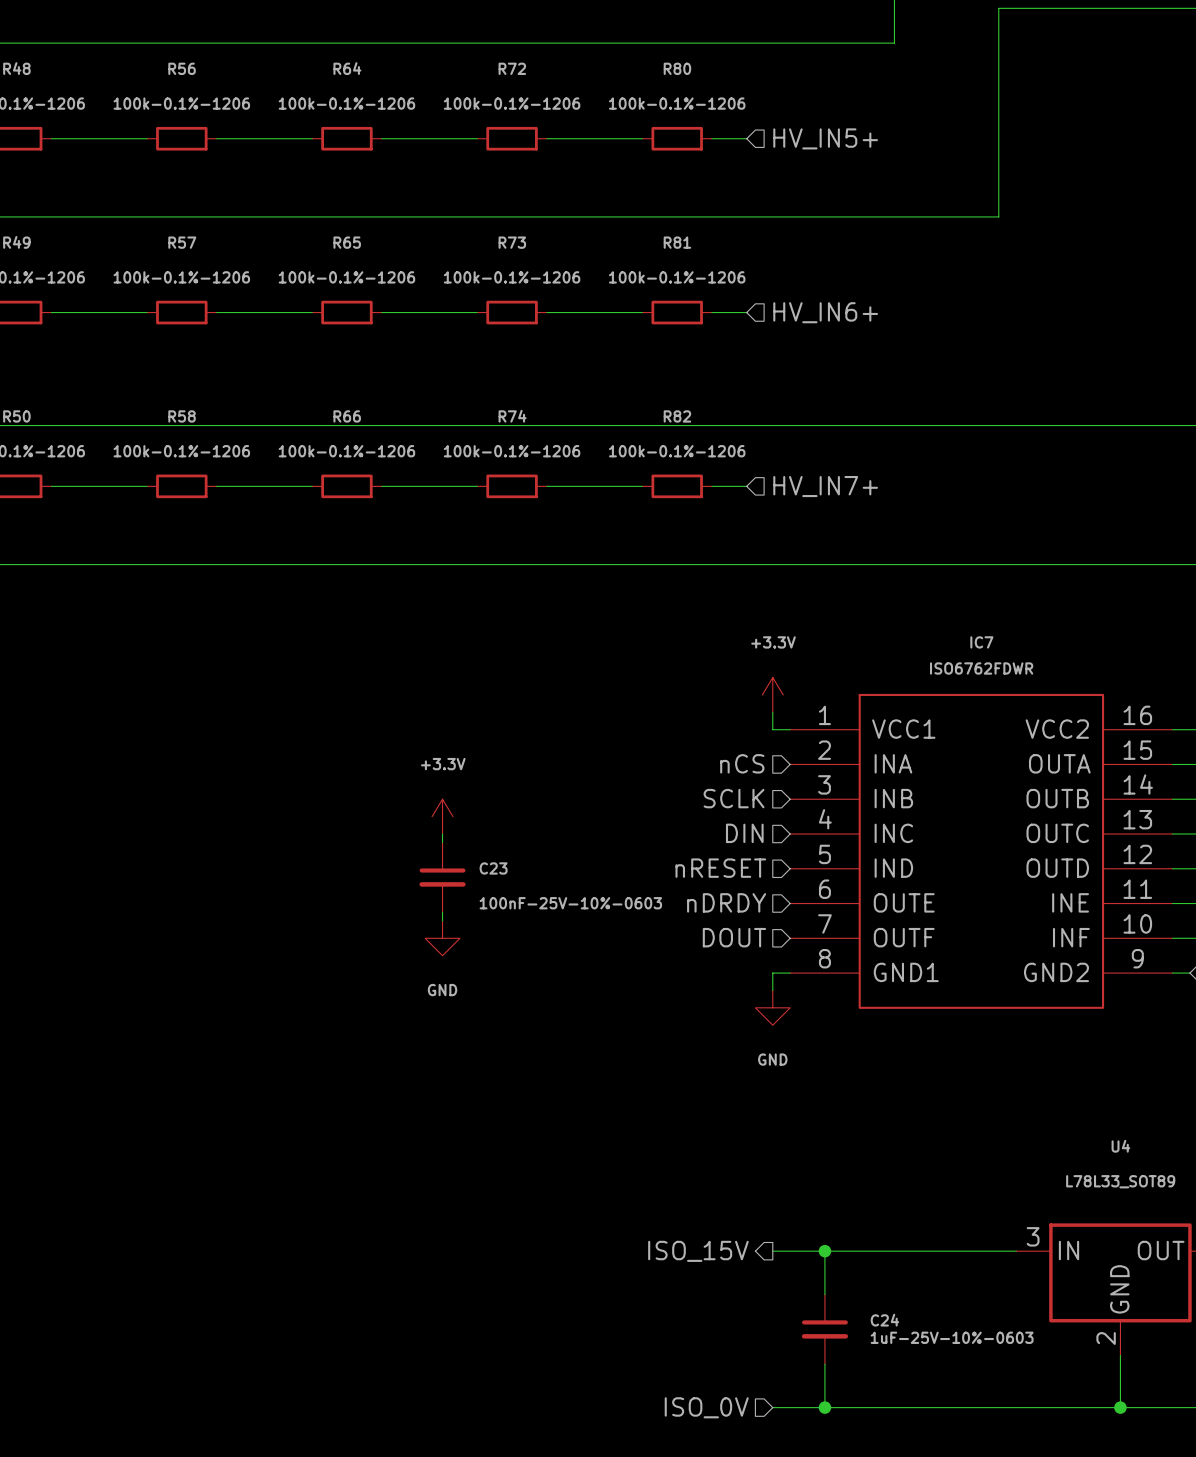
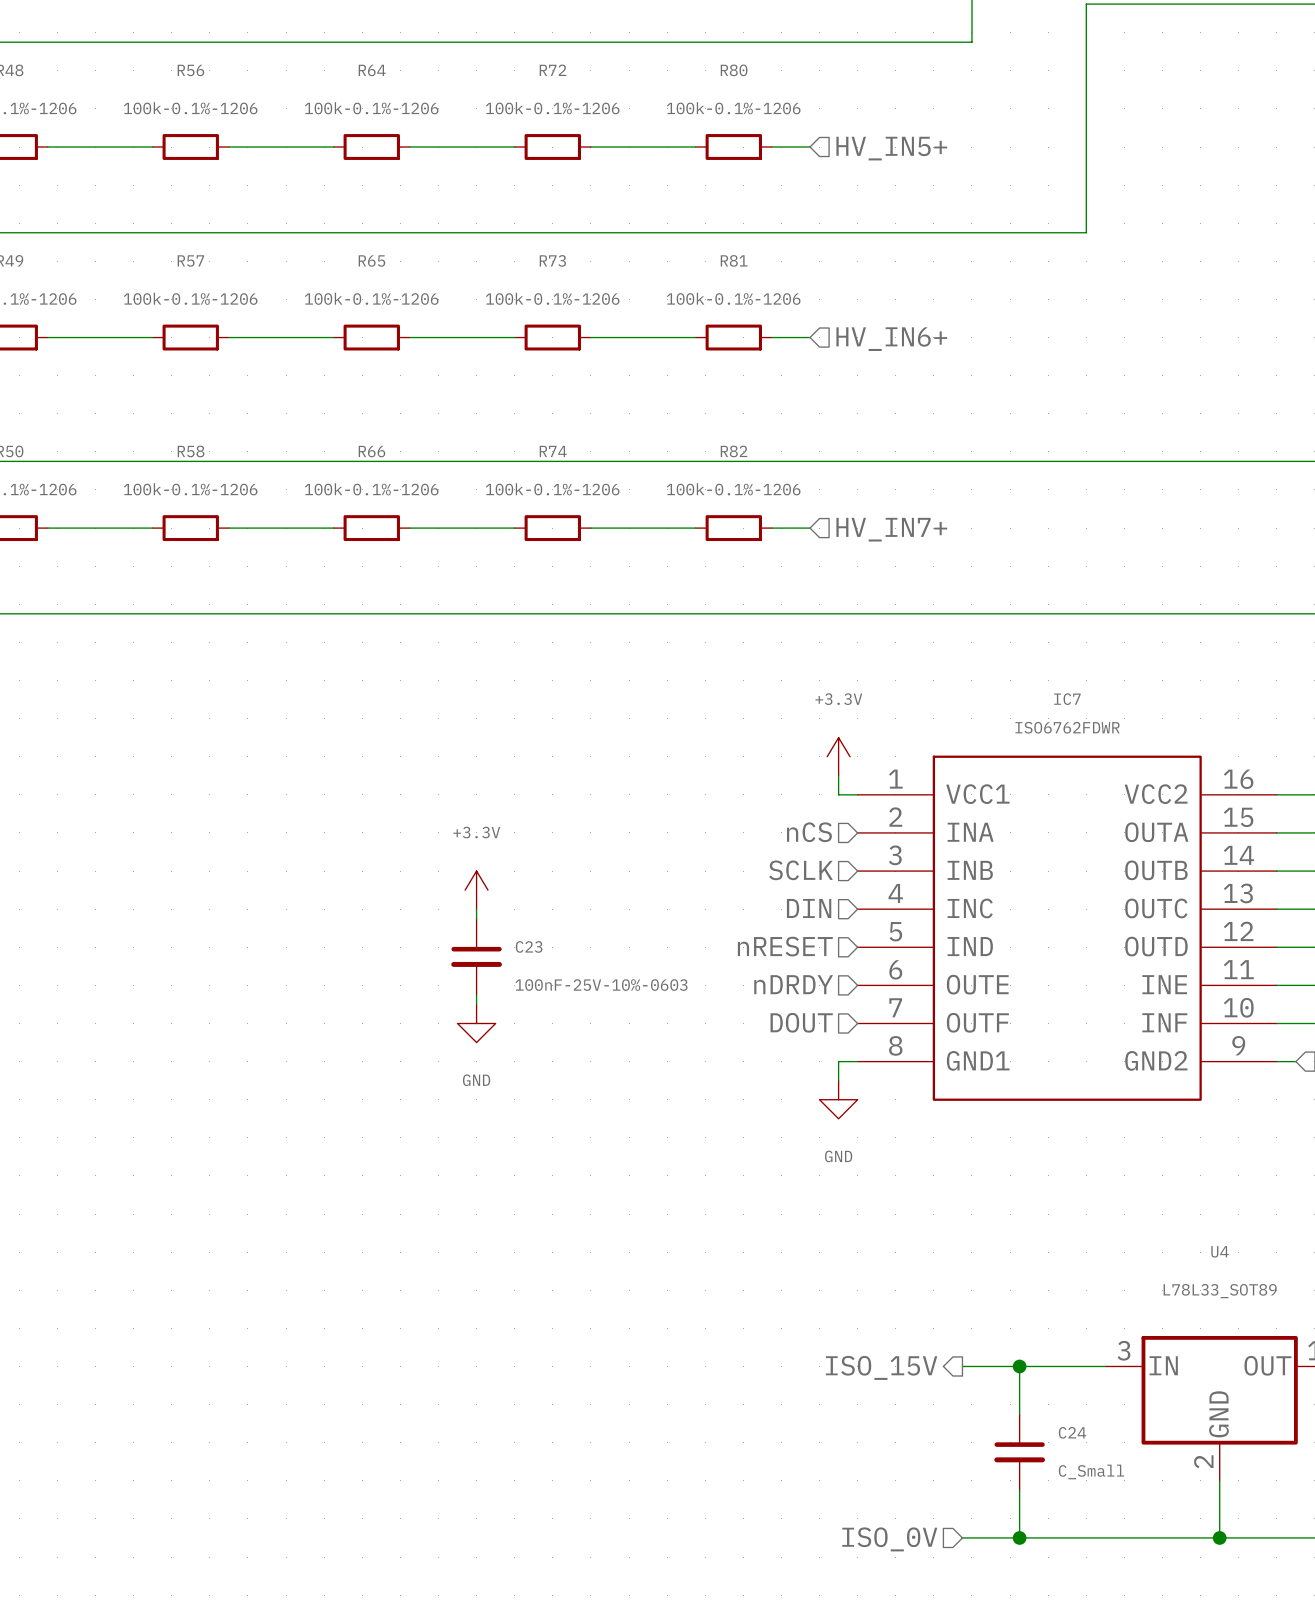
hierarchical label position: ISO_15V (698, 1251) -> ISO_15V (881, 1367)
wire: (772, 1251) (885, 1251) -> none
wire: (824, 1251) (824, 1294) -> (1019, 1366) (1019, 1414)
junction: (824, 1251) -> none
junction: none -> (1019, 1366)
C24 name position: C24 (884, 1320) -> C24 (1072, 1432)
C24 position: (824, 1329) -> (1019, 1452)
C24 value: 1uF-25V-10%-0603 (952, 1337) -> C_Small (1091, 1471)
wire: (824, 1364) (824, 1407) -> (1019, 1490) (1019, 1537)
hierarchical label position: ISO_0V (706, 1407) -> ISO_0V (889, 1539)
wire: (772, 1407) (885, 1407) -> none
junction: (824, 1407) -> none
junction: none -> (1019, 1537)

